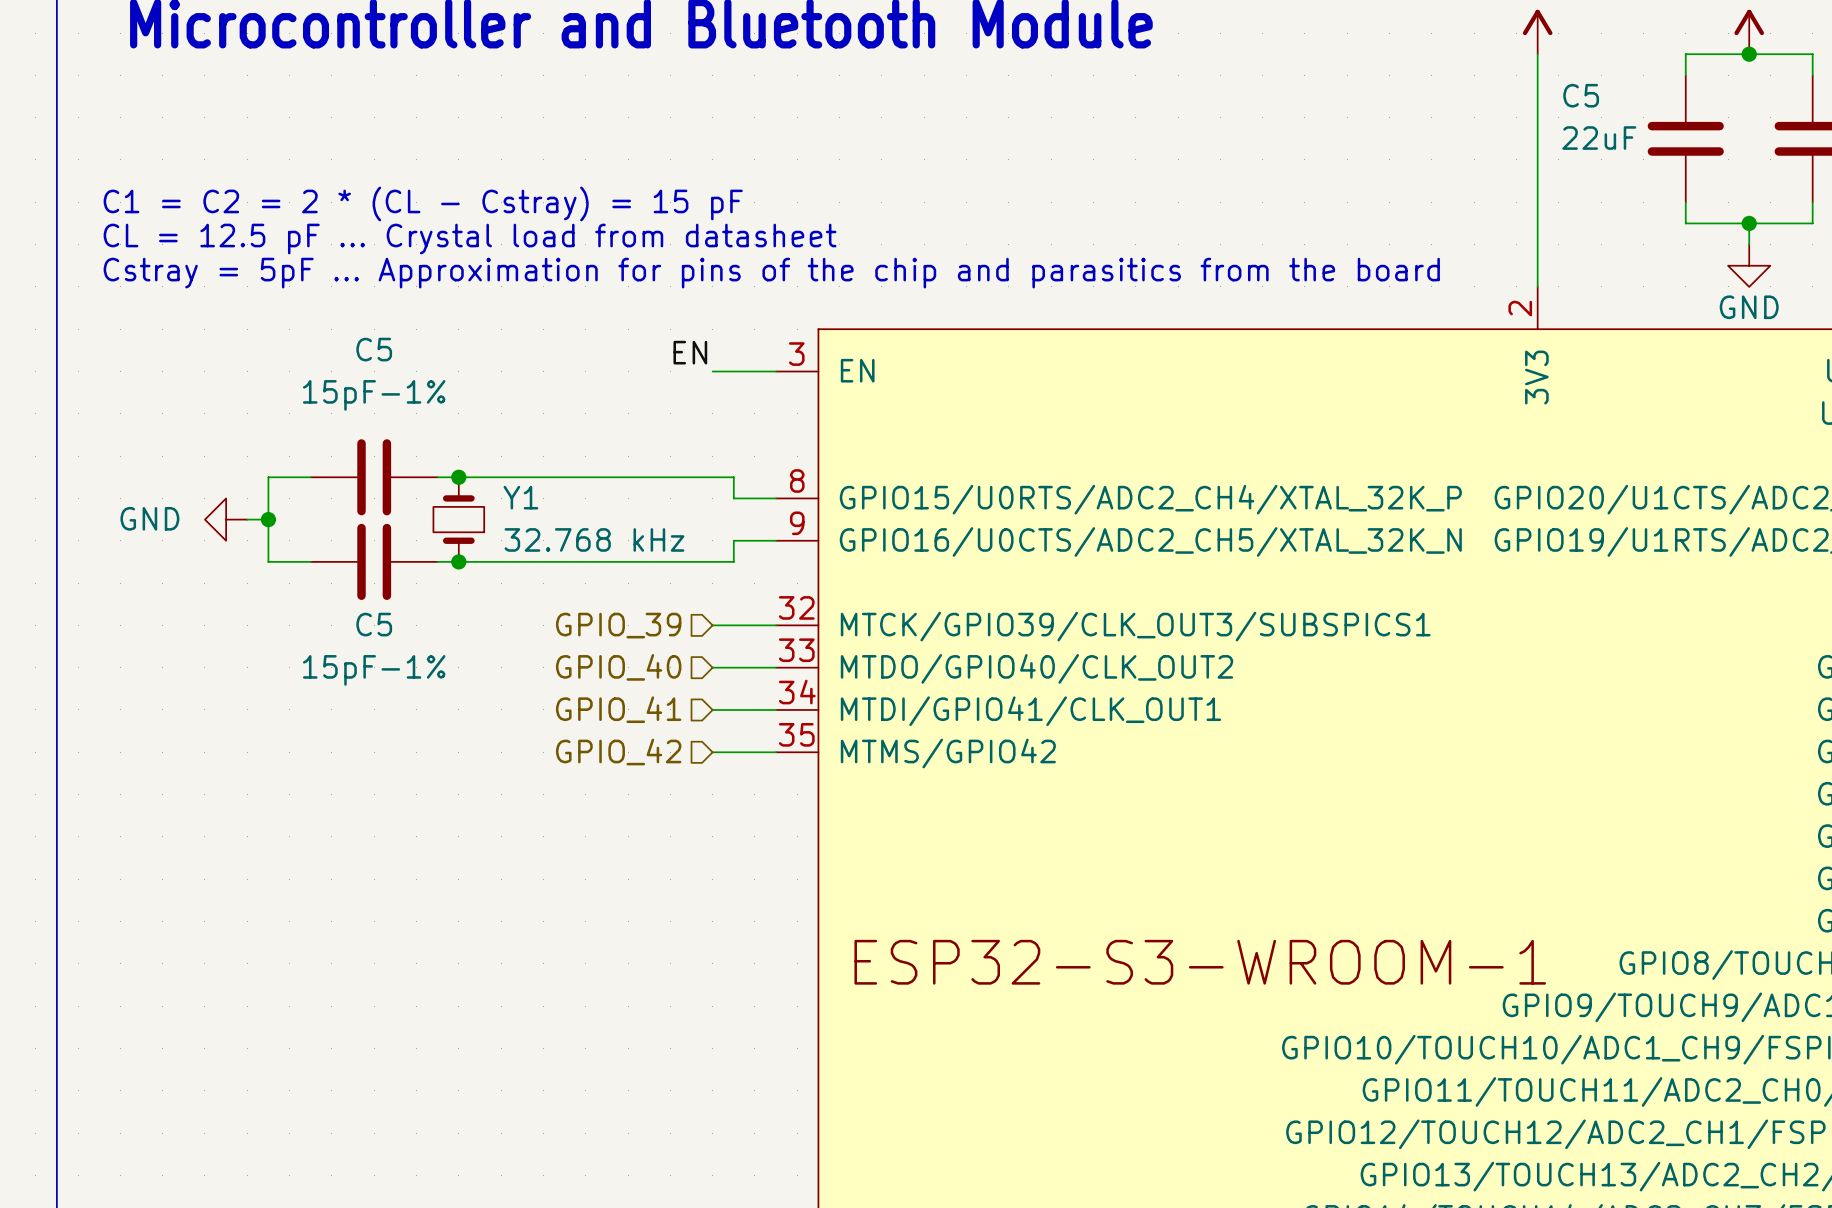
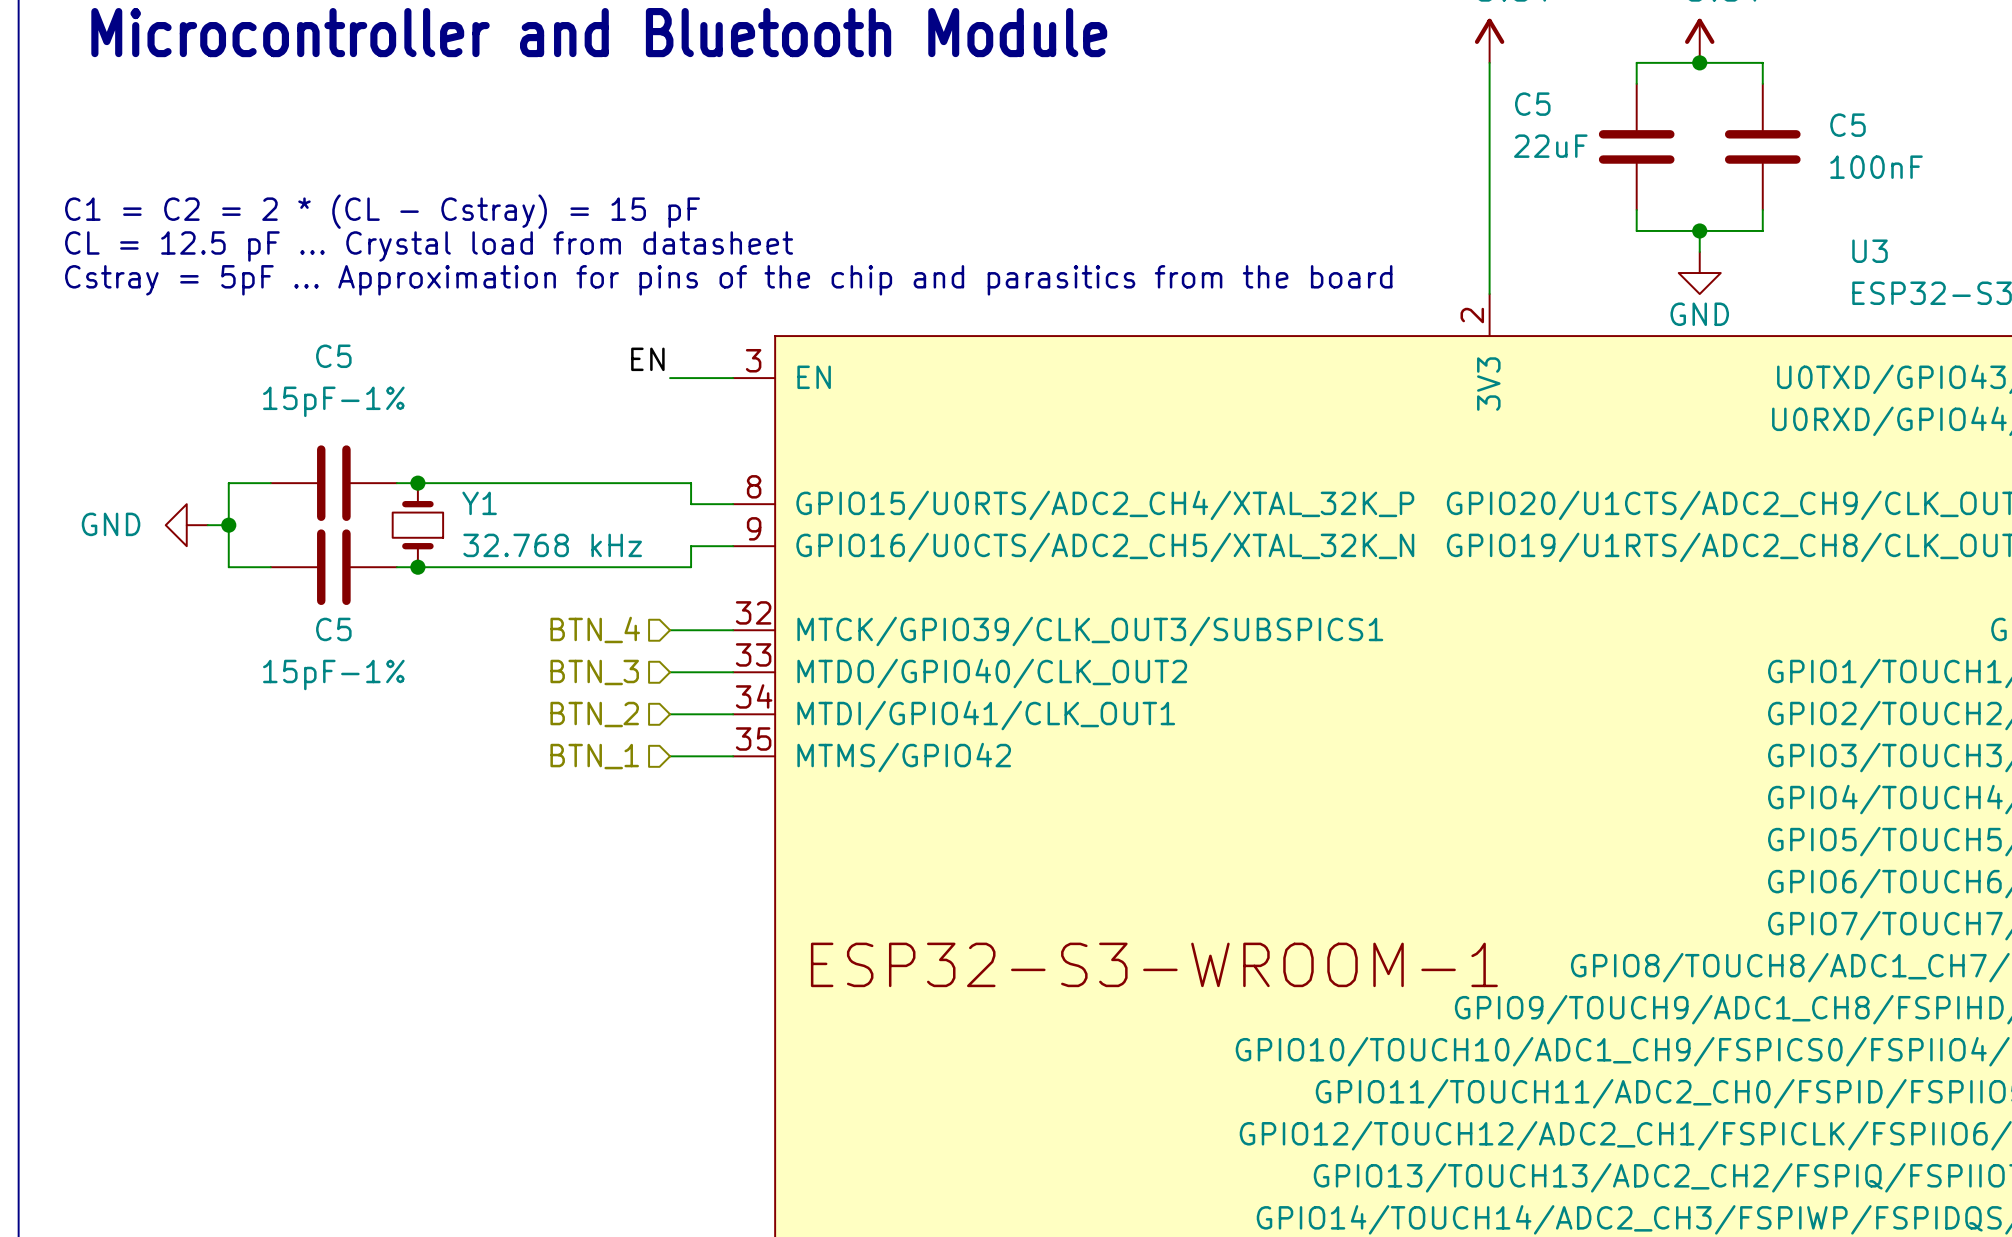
hierarchical label: GPIO_39 (618, 625) -> BTN_4 (595, 629)
hierarchical label: GPIO_40 (618, 667) -> BTN_3 (594, 672)
hierarchical label: GPIO_41 (618, 709) -> BTN_2 (594, 714)
hierarchical label: GPIO_42 (618, 752) -> BTN_1 (594, 756)

